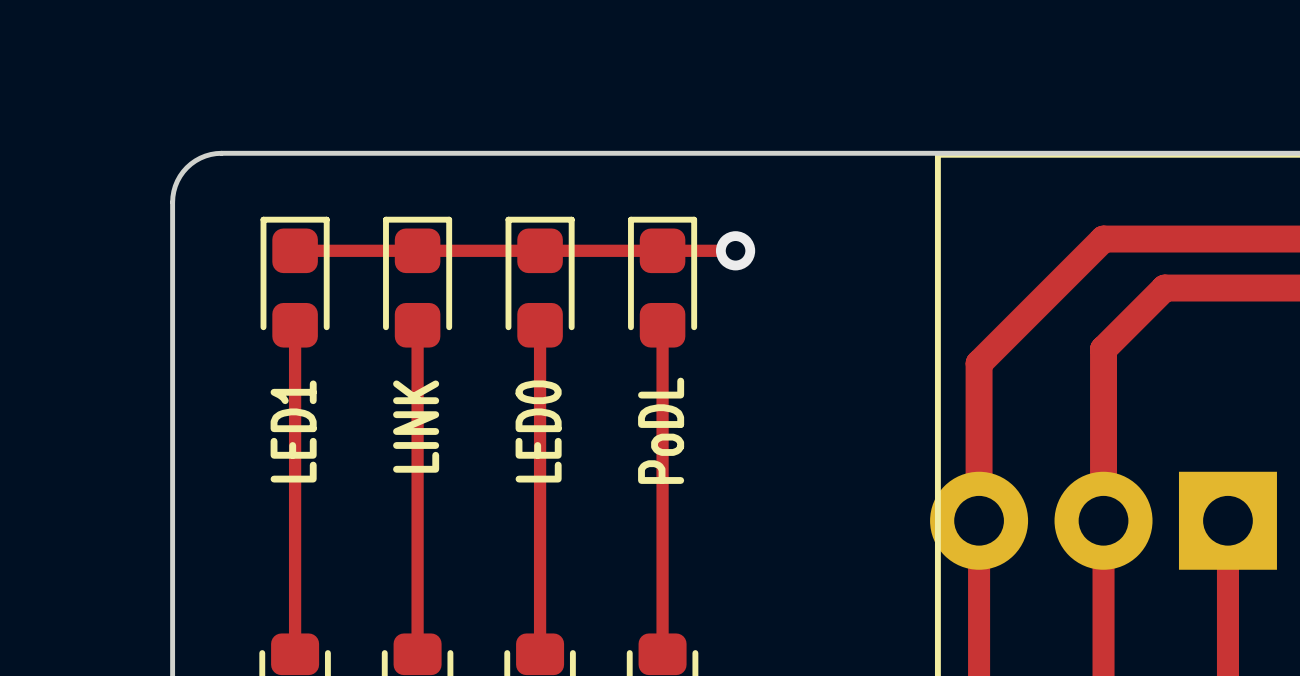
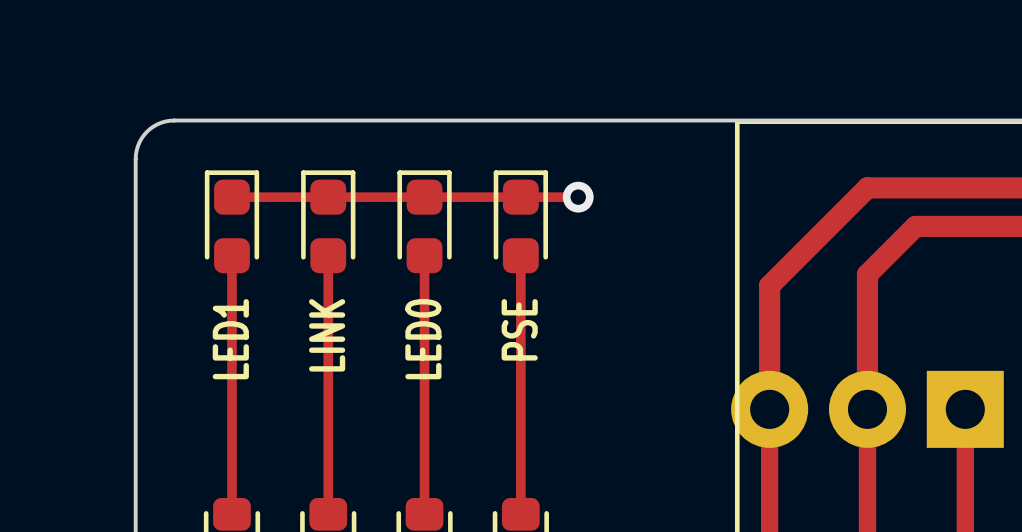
text: PoDL (661, 430) -> PSE (519, 329)

